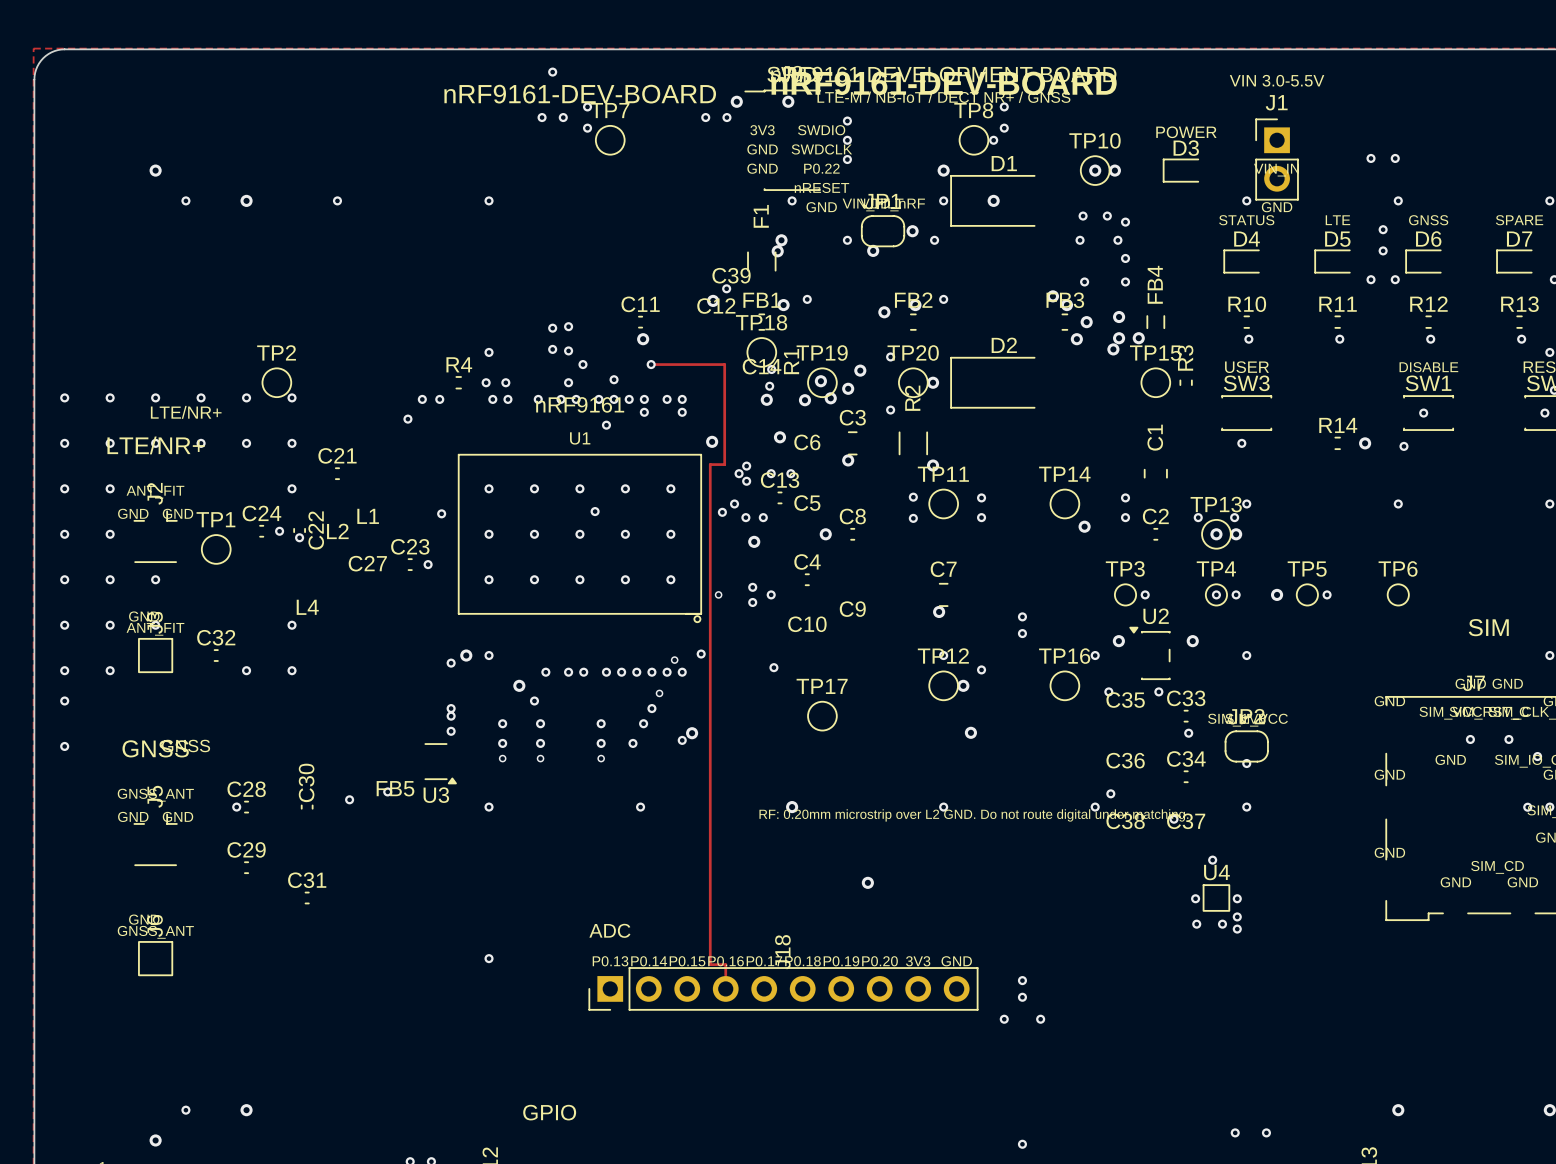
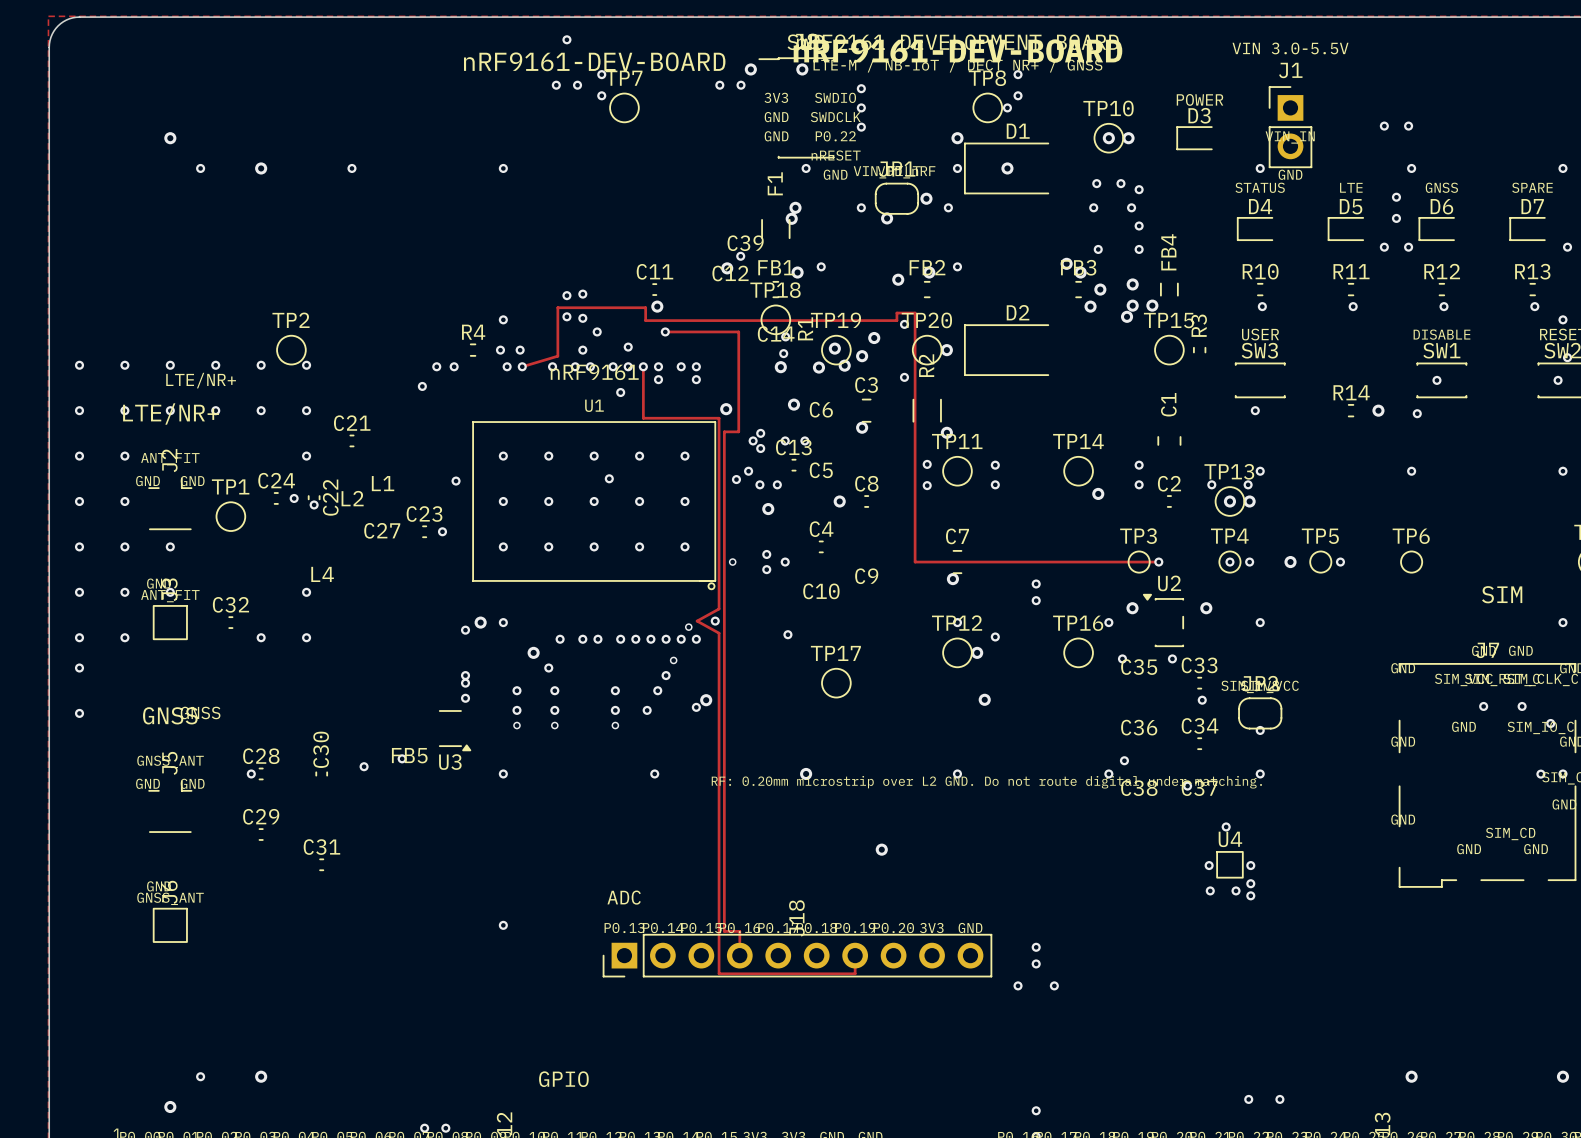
track: none -> (522, 366) (557, 356) (557, 307) (645, 307) (645, 320) (896, 320) (896, 313) (915, 313) (915, 562) (1158, 562)
track: none -> (643, 366) (643, 418) (719, 418) (719, 608) (697, 621) (719, 633) (719, 973) (855, 973) (855, 955)

